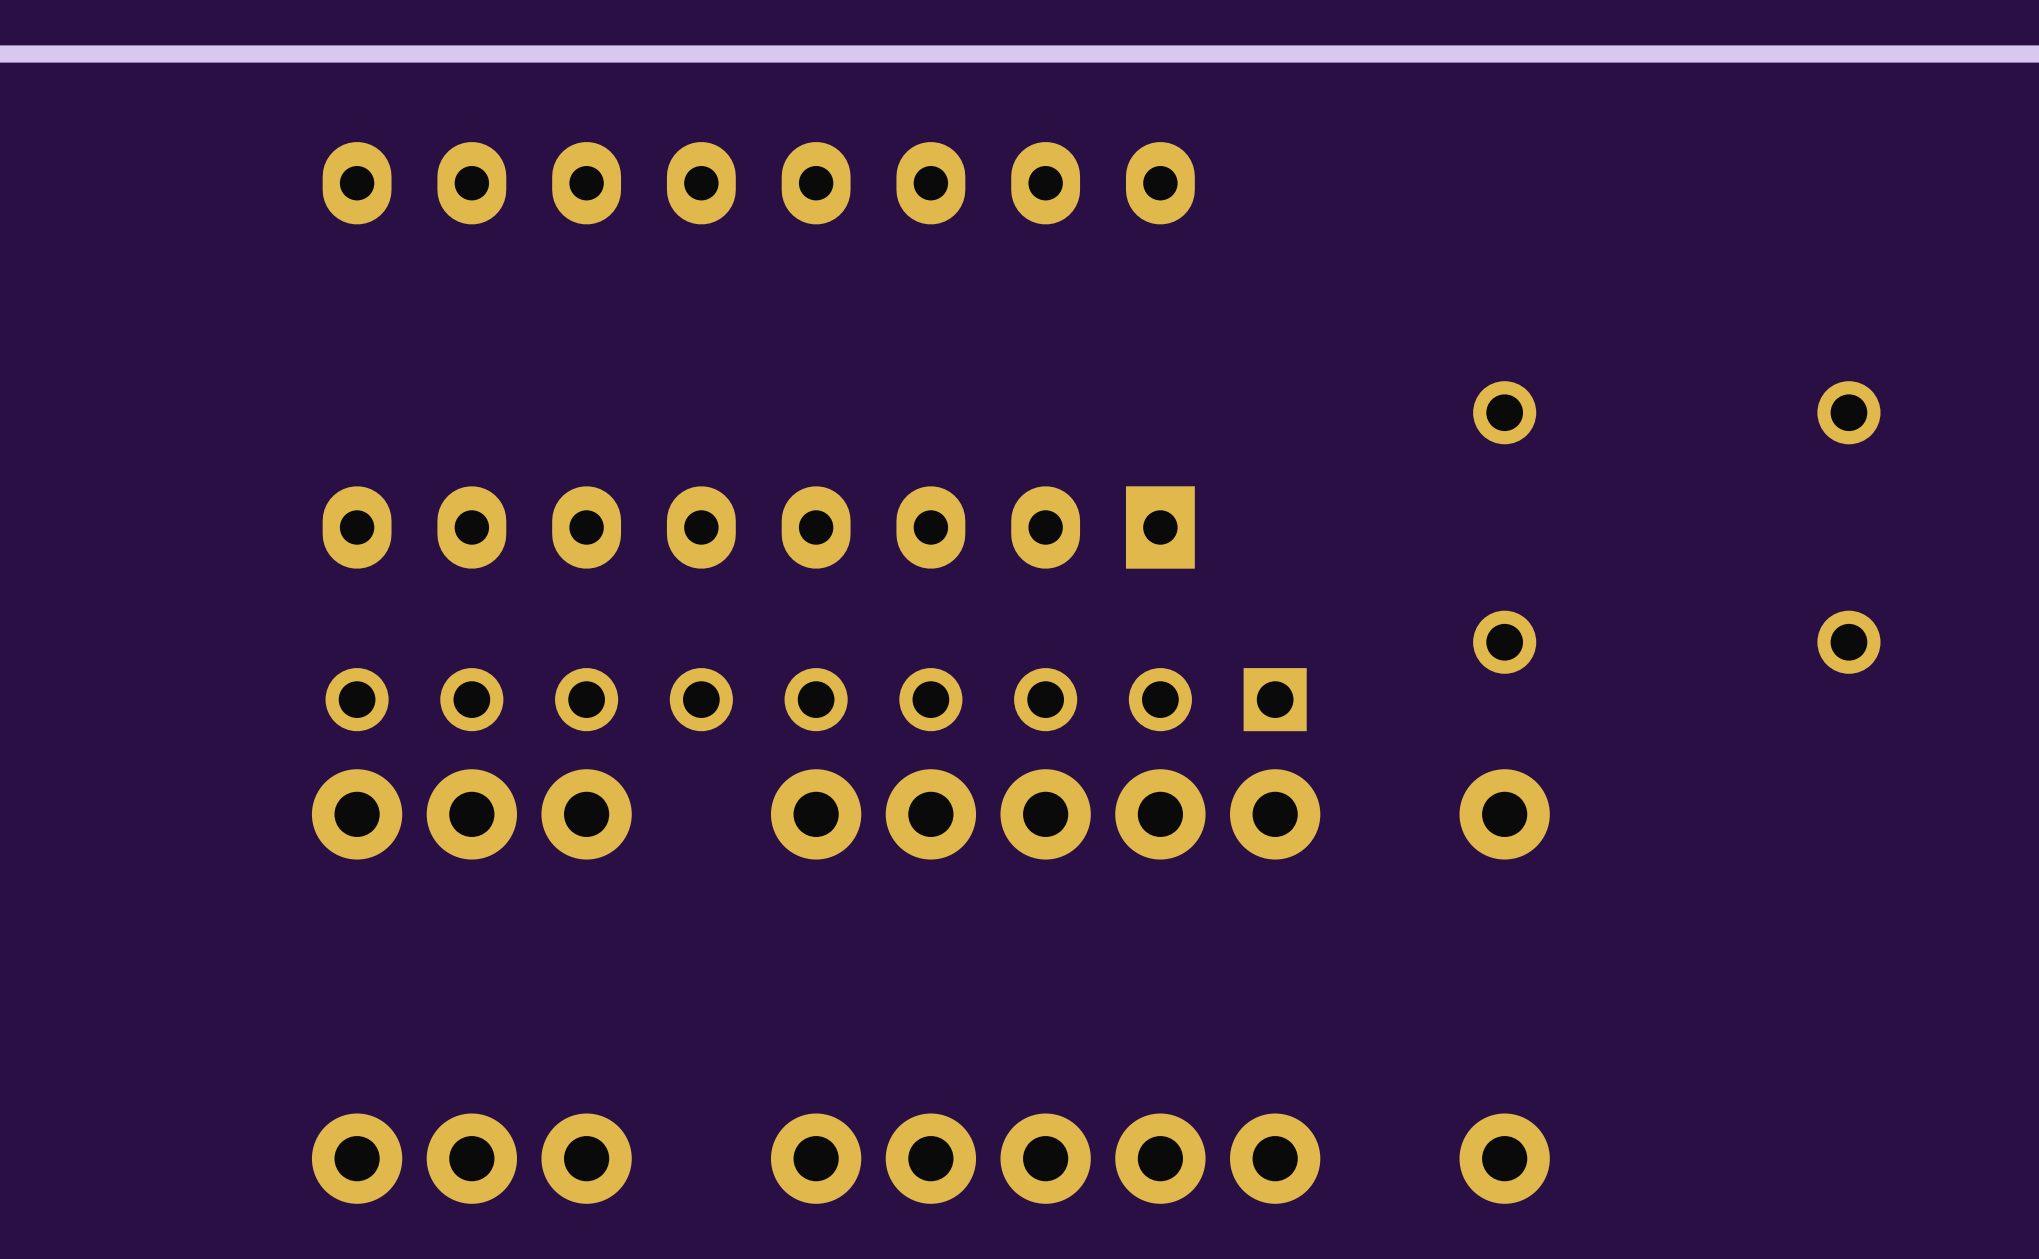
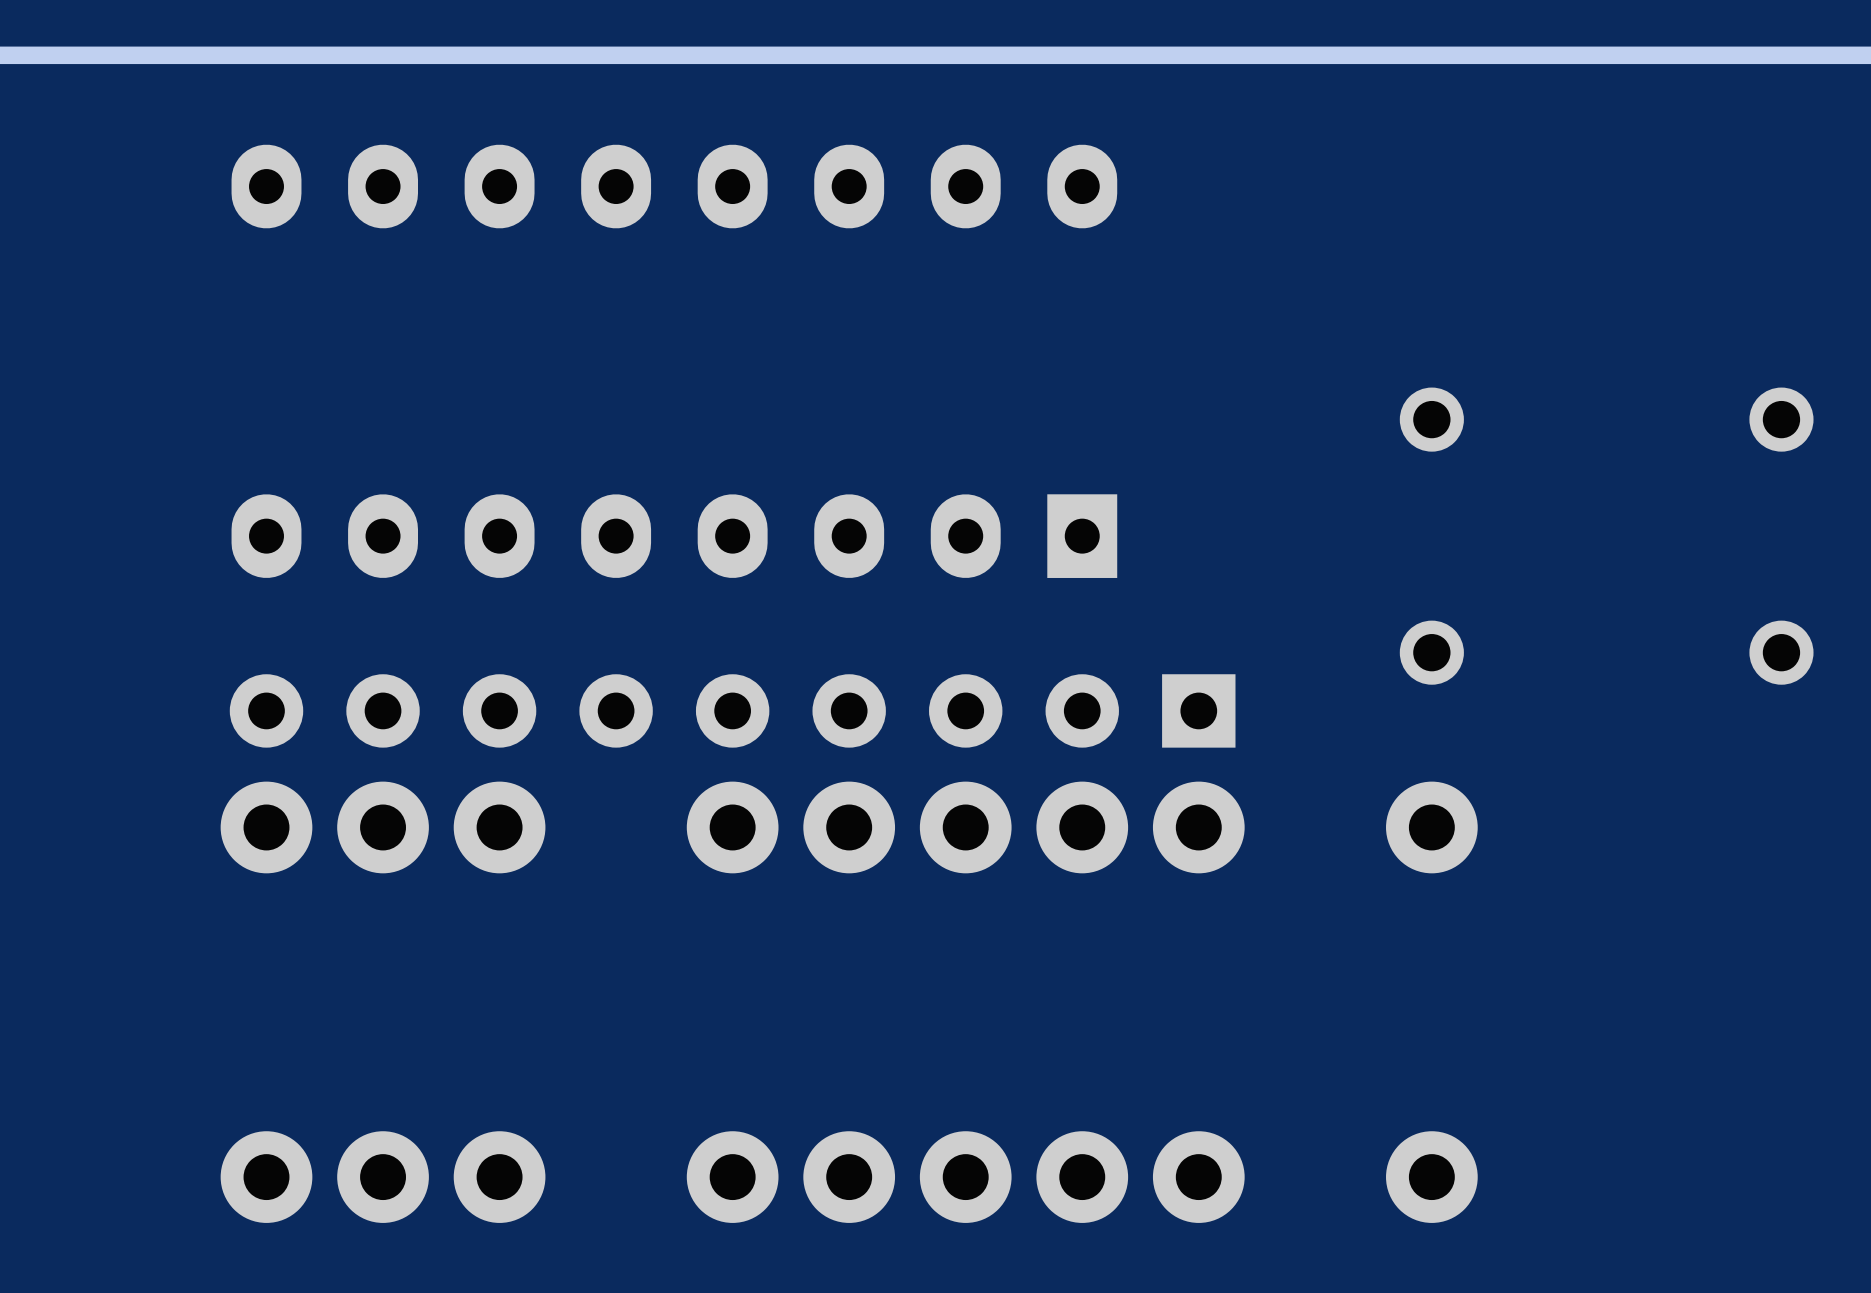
part footprint: [325, 668, 1307, 732] -> [229, 674, 1236, 748]

